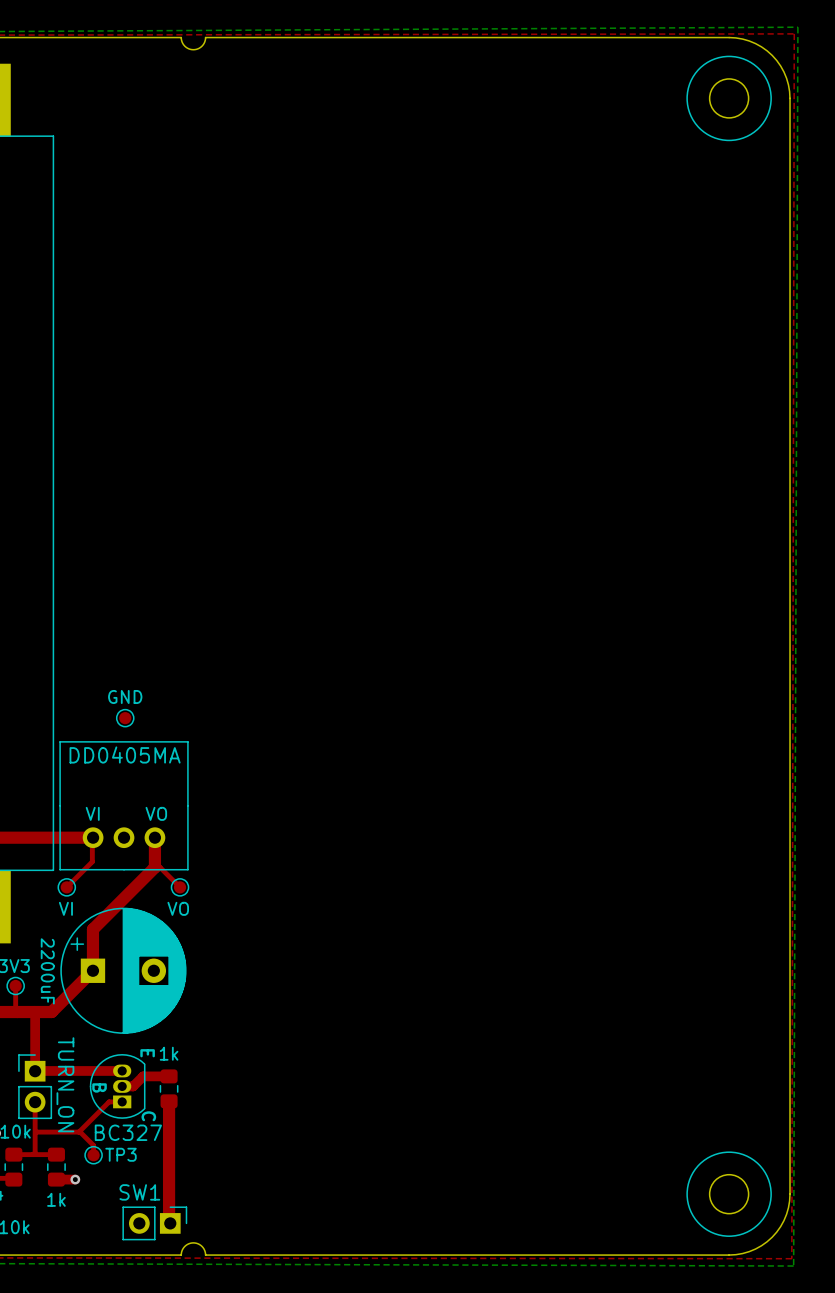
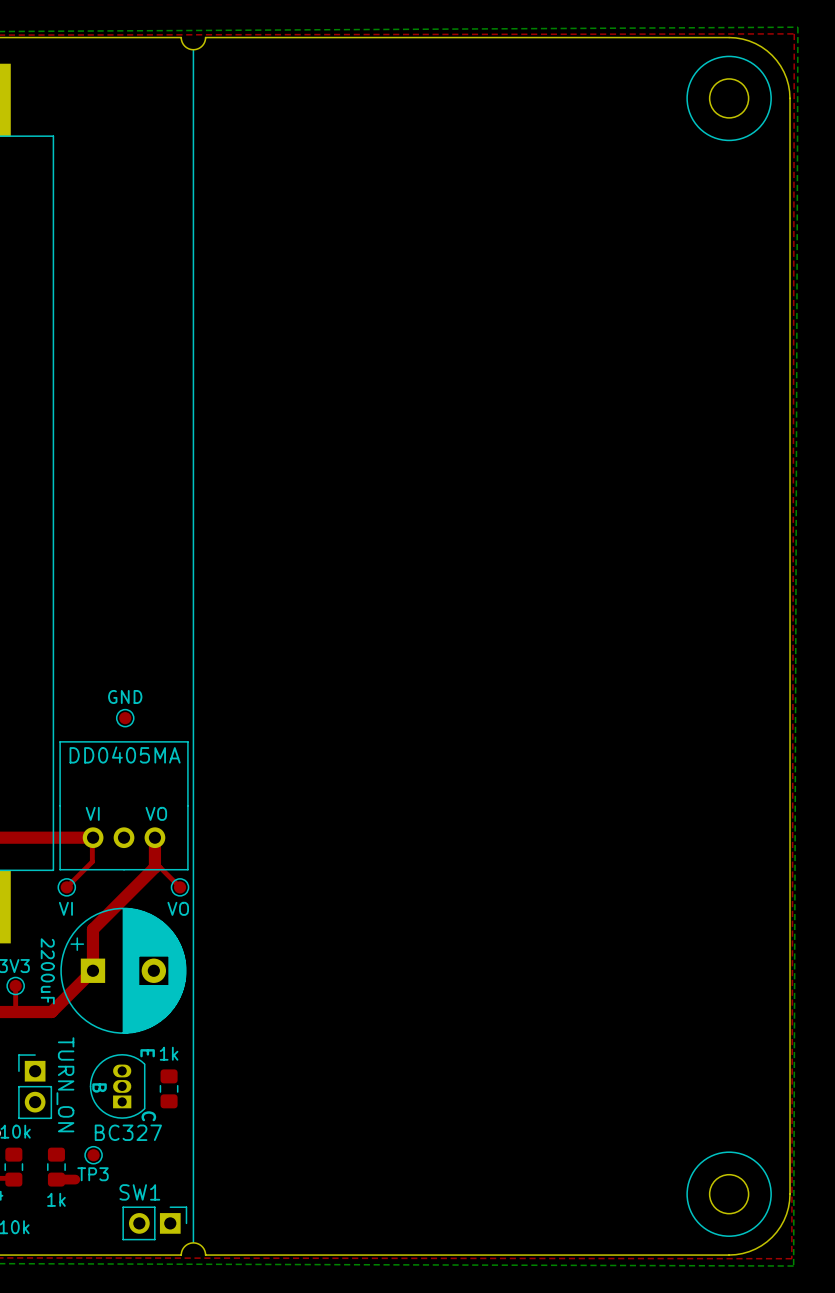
line: none -> (193, 50) (193, 1242)
top track: (34, 1012) (35, 1071) (122, 1070) -> none
top track: (169, 1076) (143, 1076) (133, 1086) (122, 1086) -> none
top track: (122, 1101) (109, 1101) (78, 1132) -> none
top track: (169, 1101) (170, 1223) -> none
top track: (35, 1102) (35, 1152) (33, 1154) -> none
top track: (37, 1132) (80, 1132) (93, 1145) (93, 1155) -> none
top track: (13, 1154) (56, 1154) -> none
TP3 name position: TP3 (121, 1154) -> TP3 (93, 1174)
via: (75, 1179) -> none

